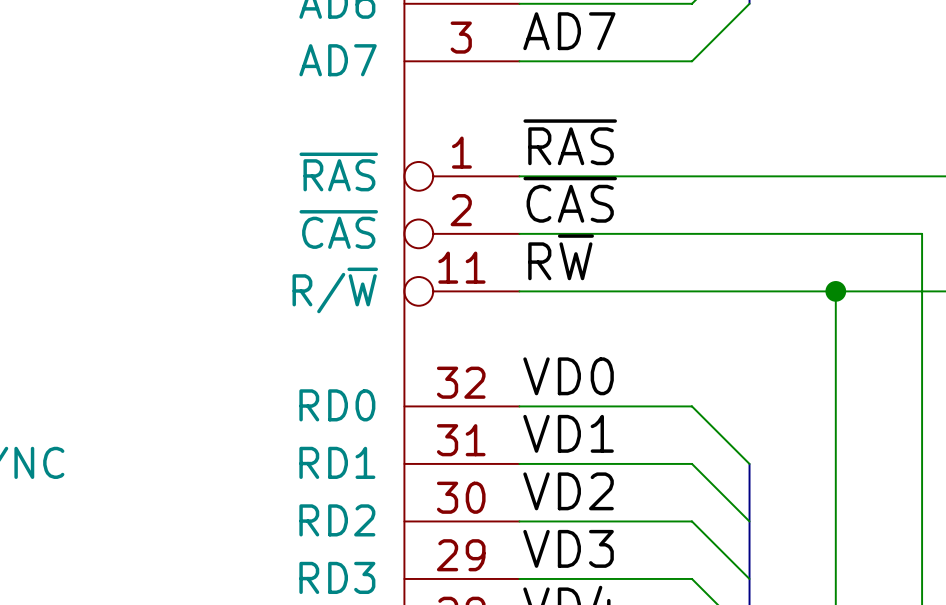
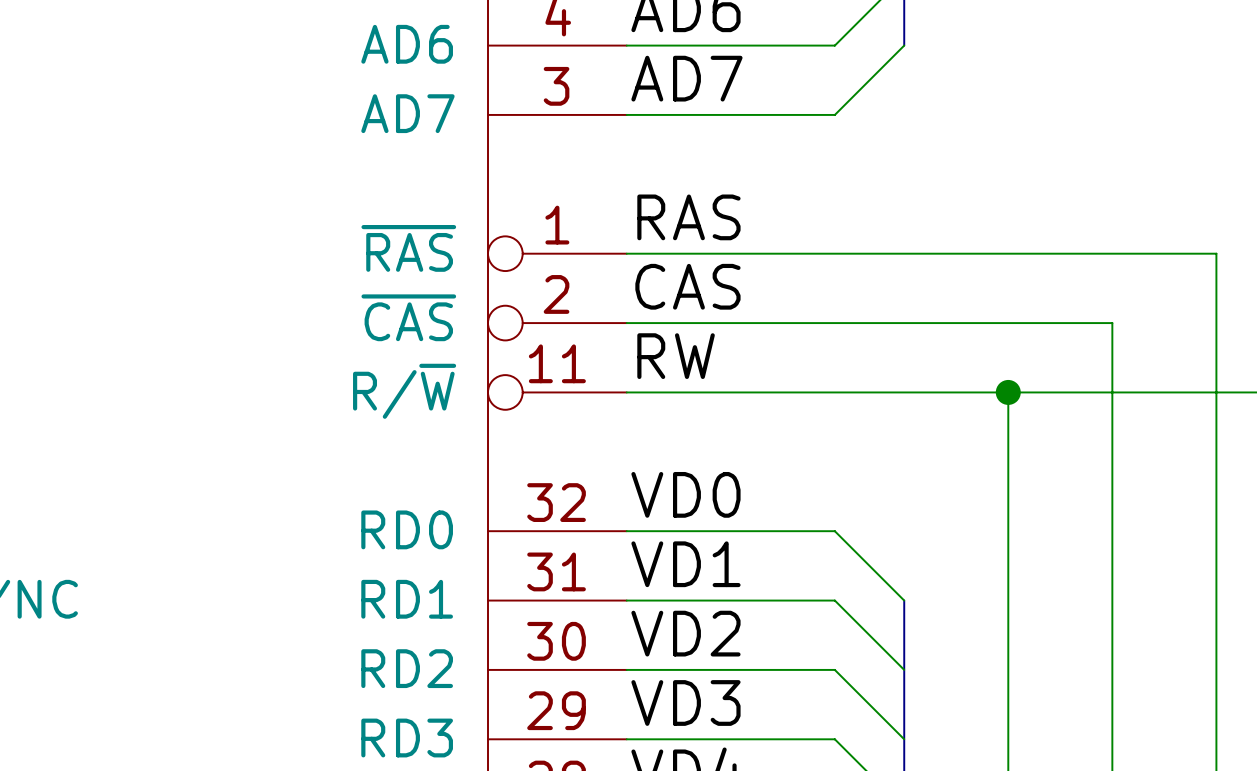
label: ~{RAS} (570, 142) -> RAS (688, 217)
label: ~{CAS} (570, 199) -> CAS (687, 286)
label: R~{W} (561, 257) -> RW (676, 356)

